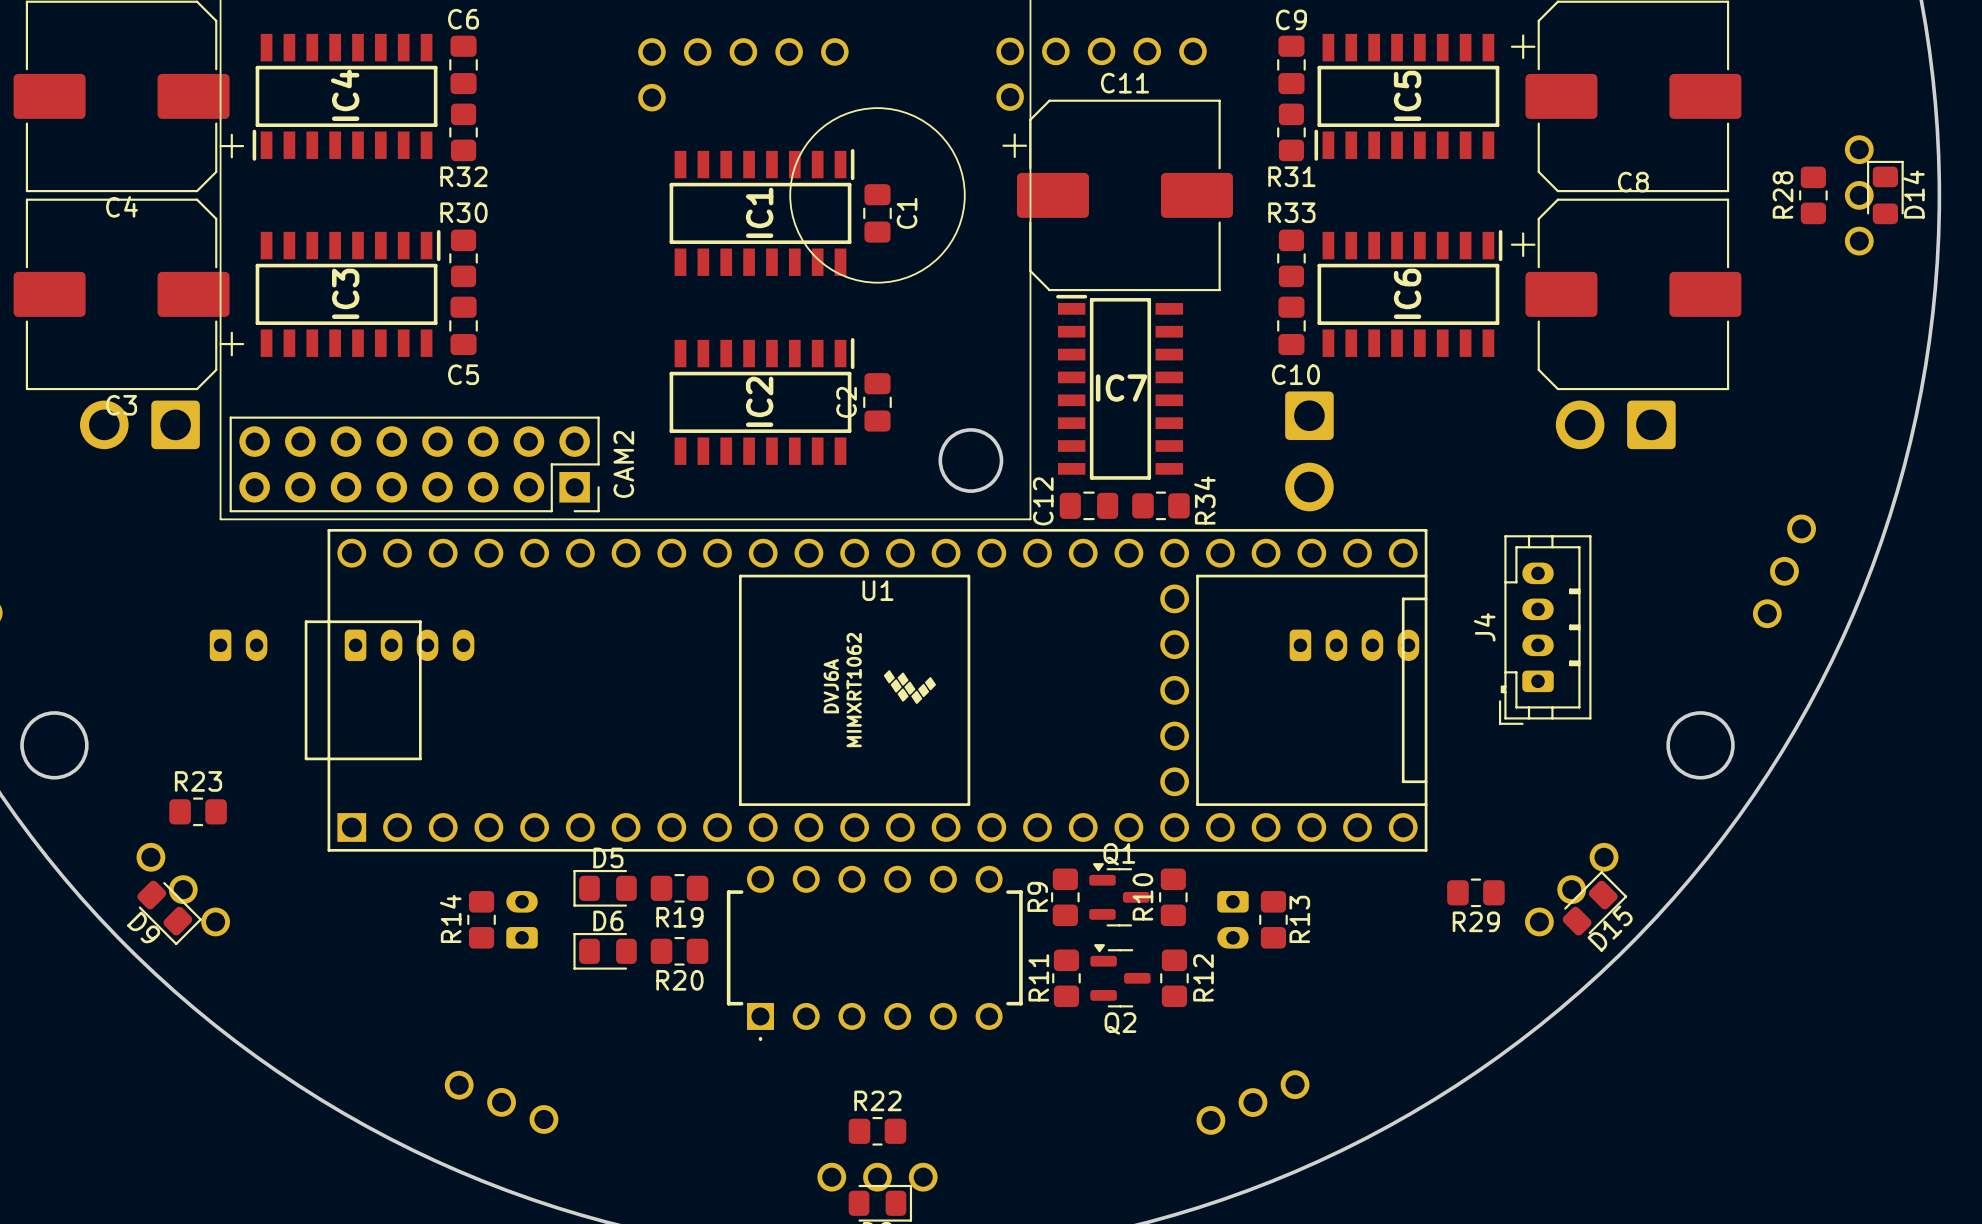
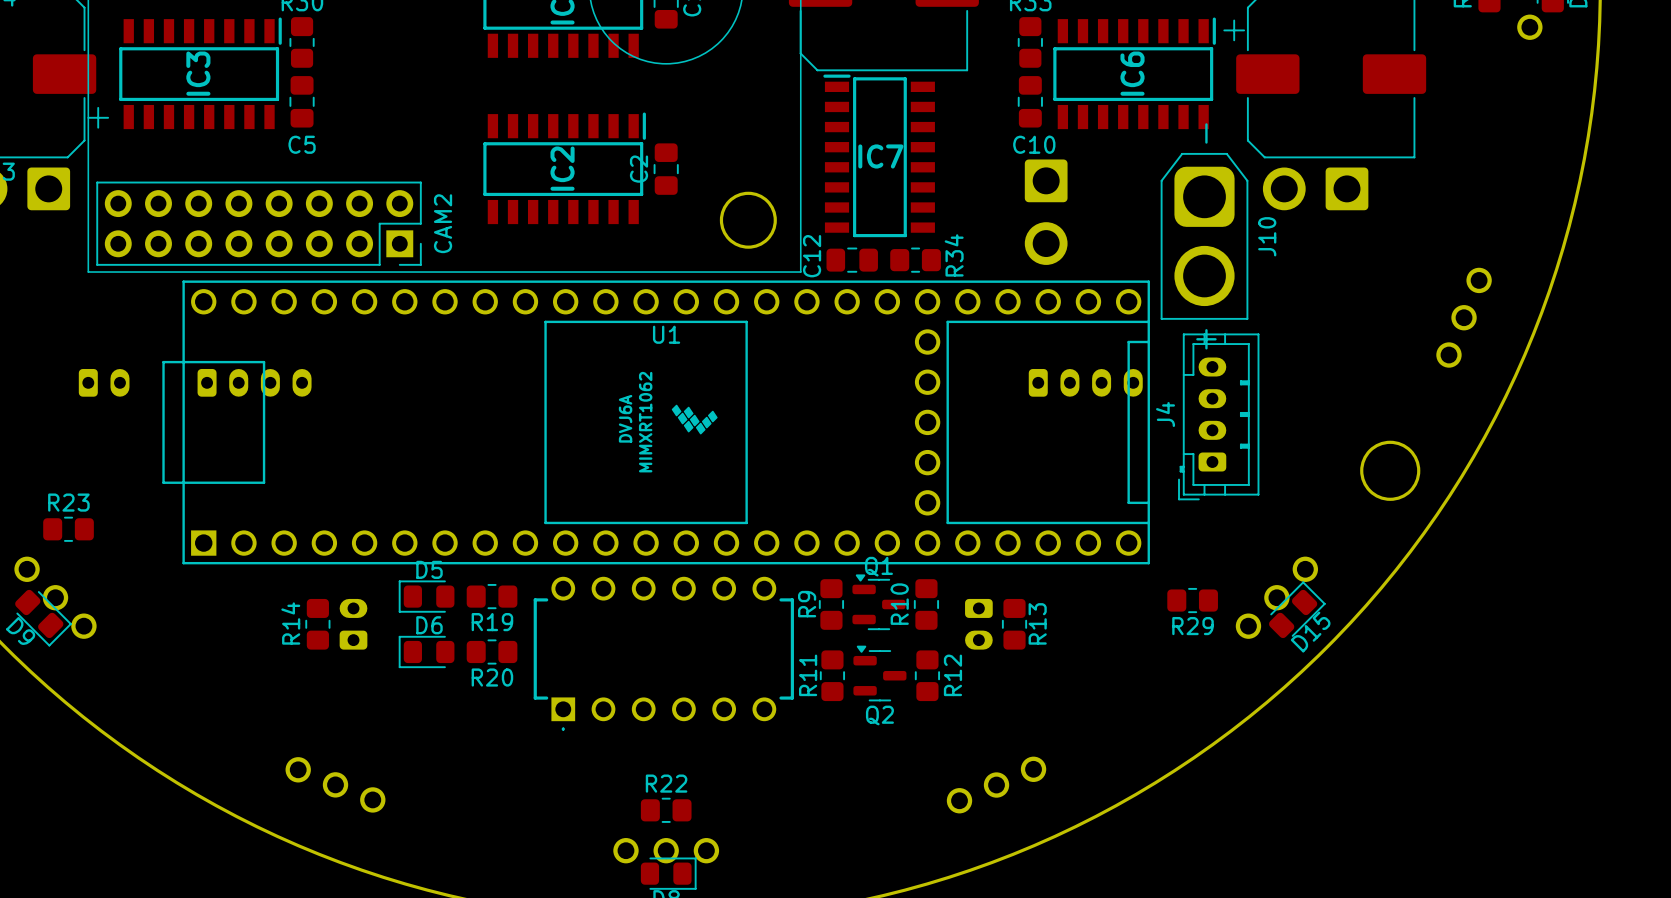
J10: none -> (1204, 236)
J4 position: (1545, 630) -> (1218, 416)

